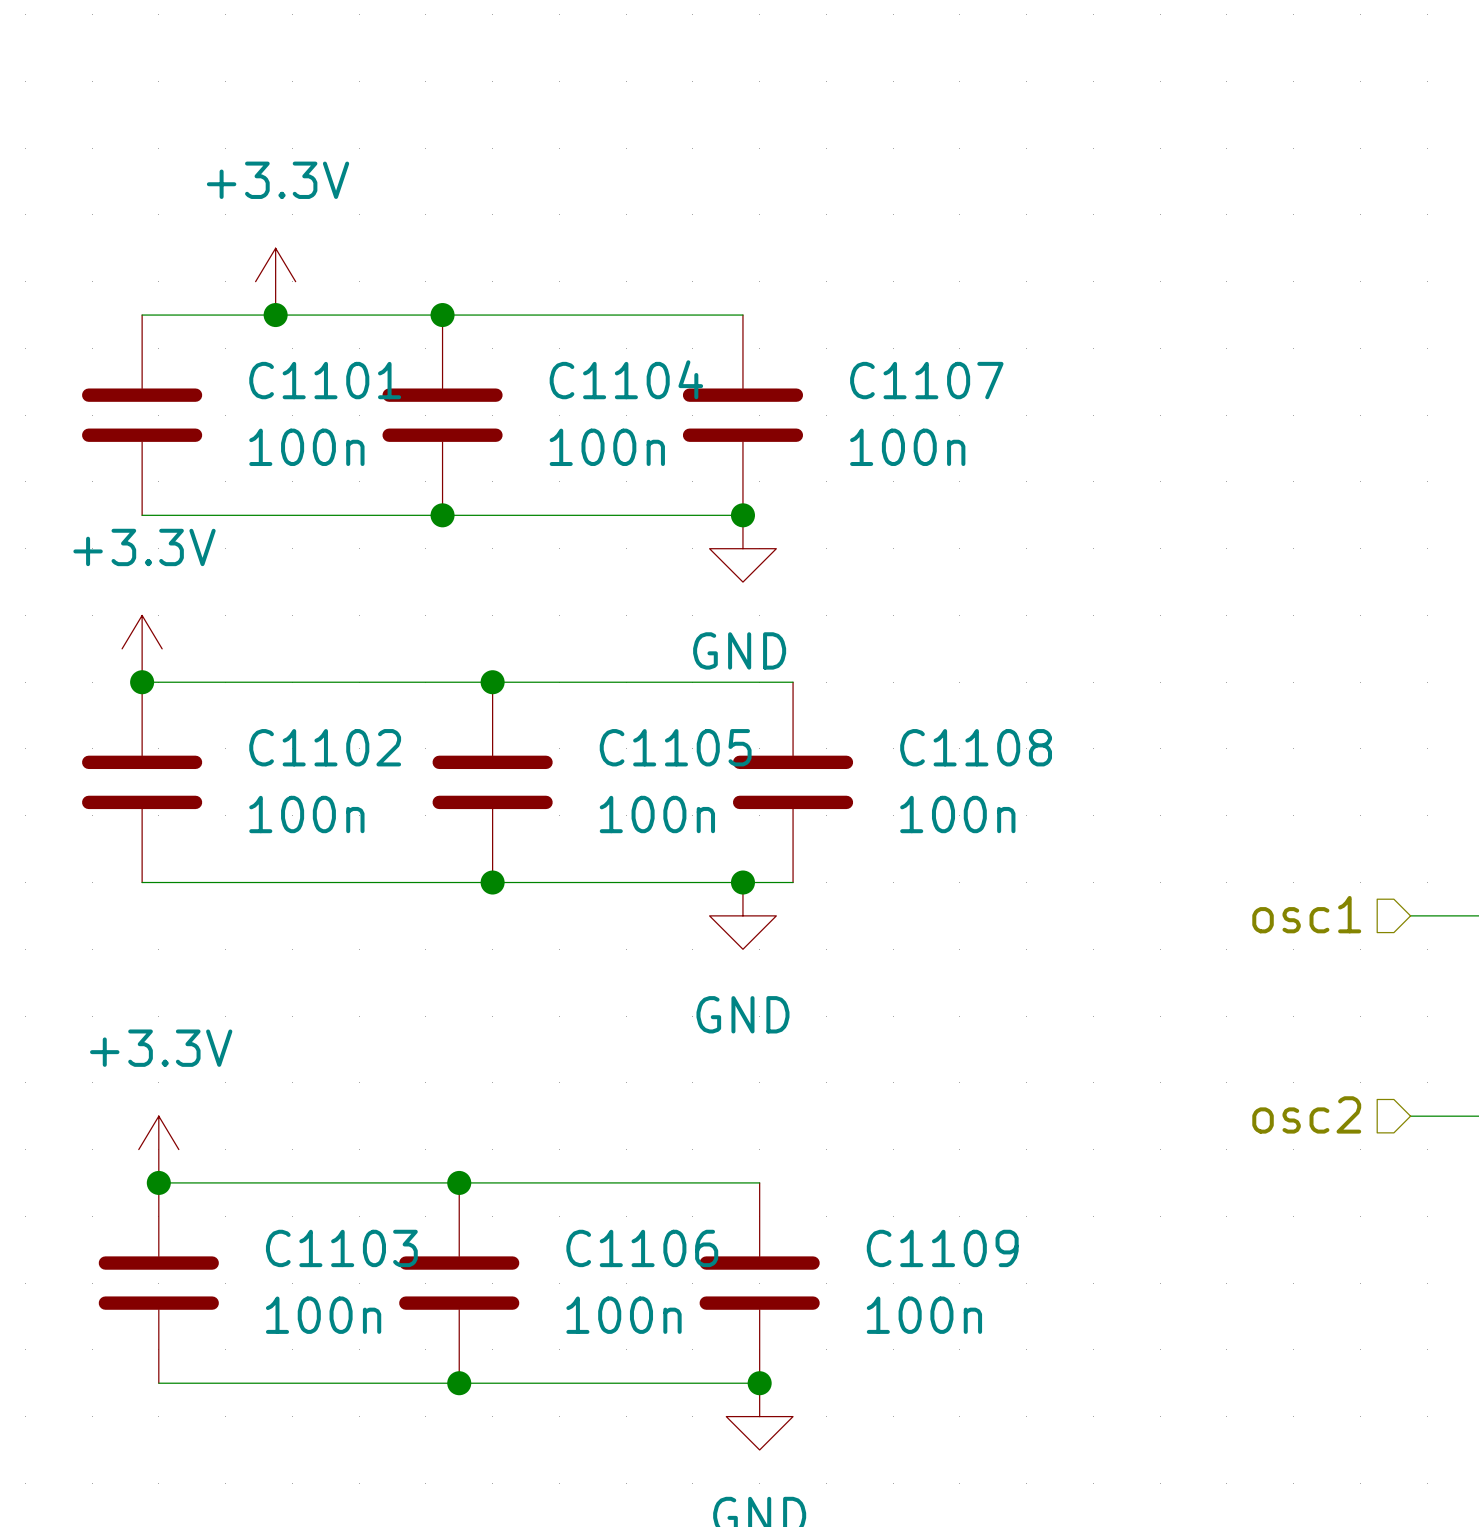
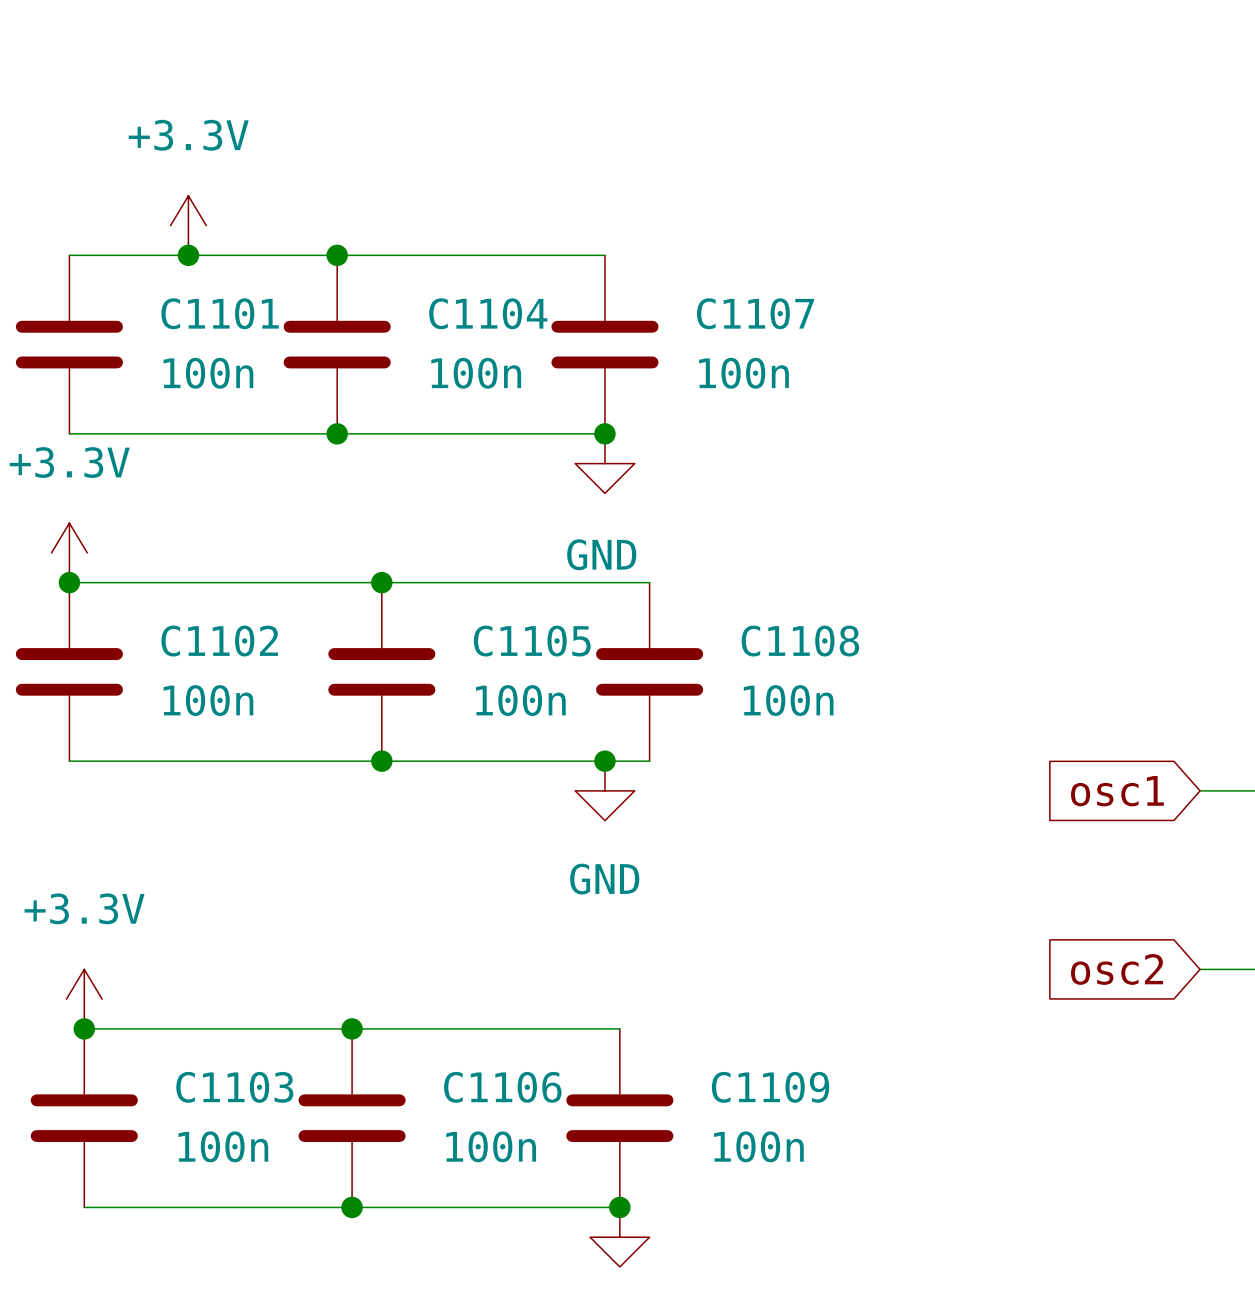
hierarchical label: osc1 (1306, 914) -> none
global label: none -> osc1 (1117, 791)
hierarchical label: osc2 (1306, 1114) -> none
global label: none -> osc2 (1117, 969)

